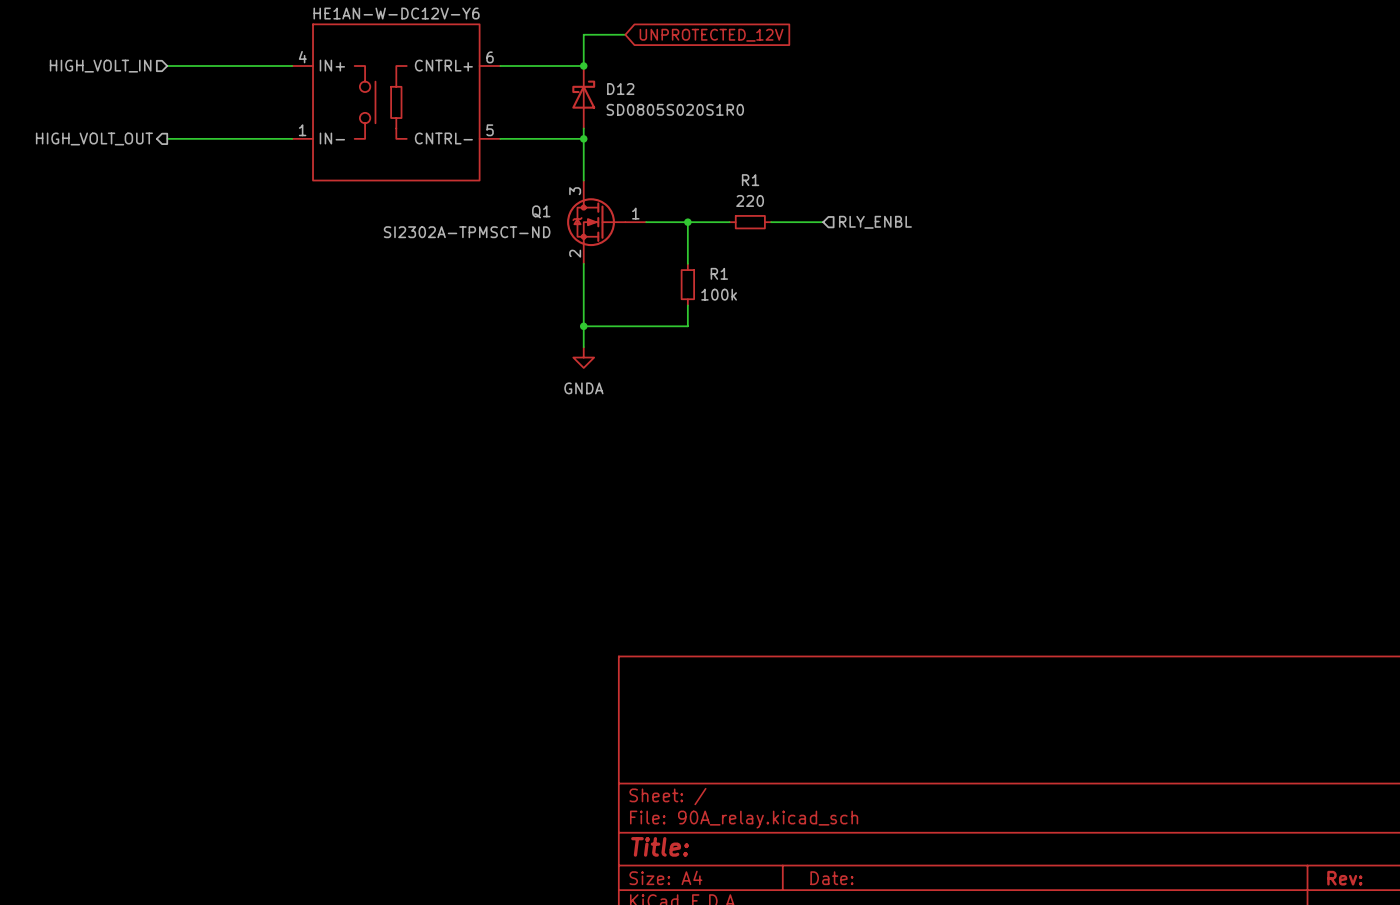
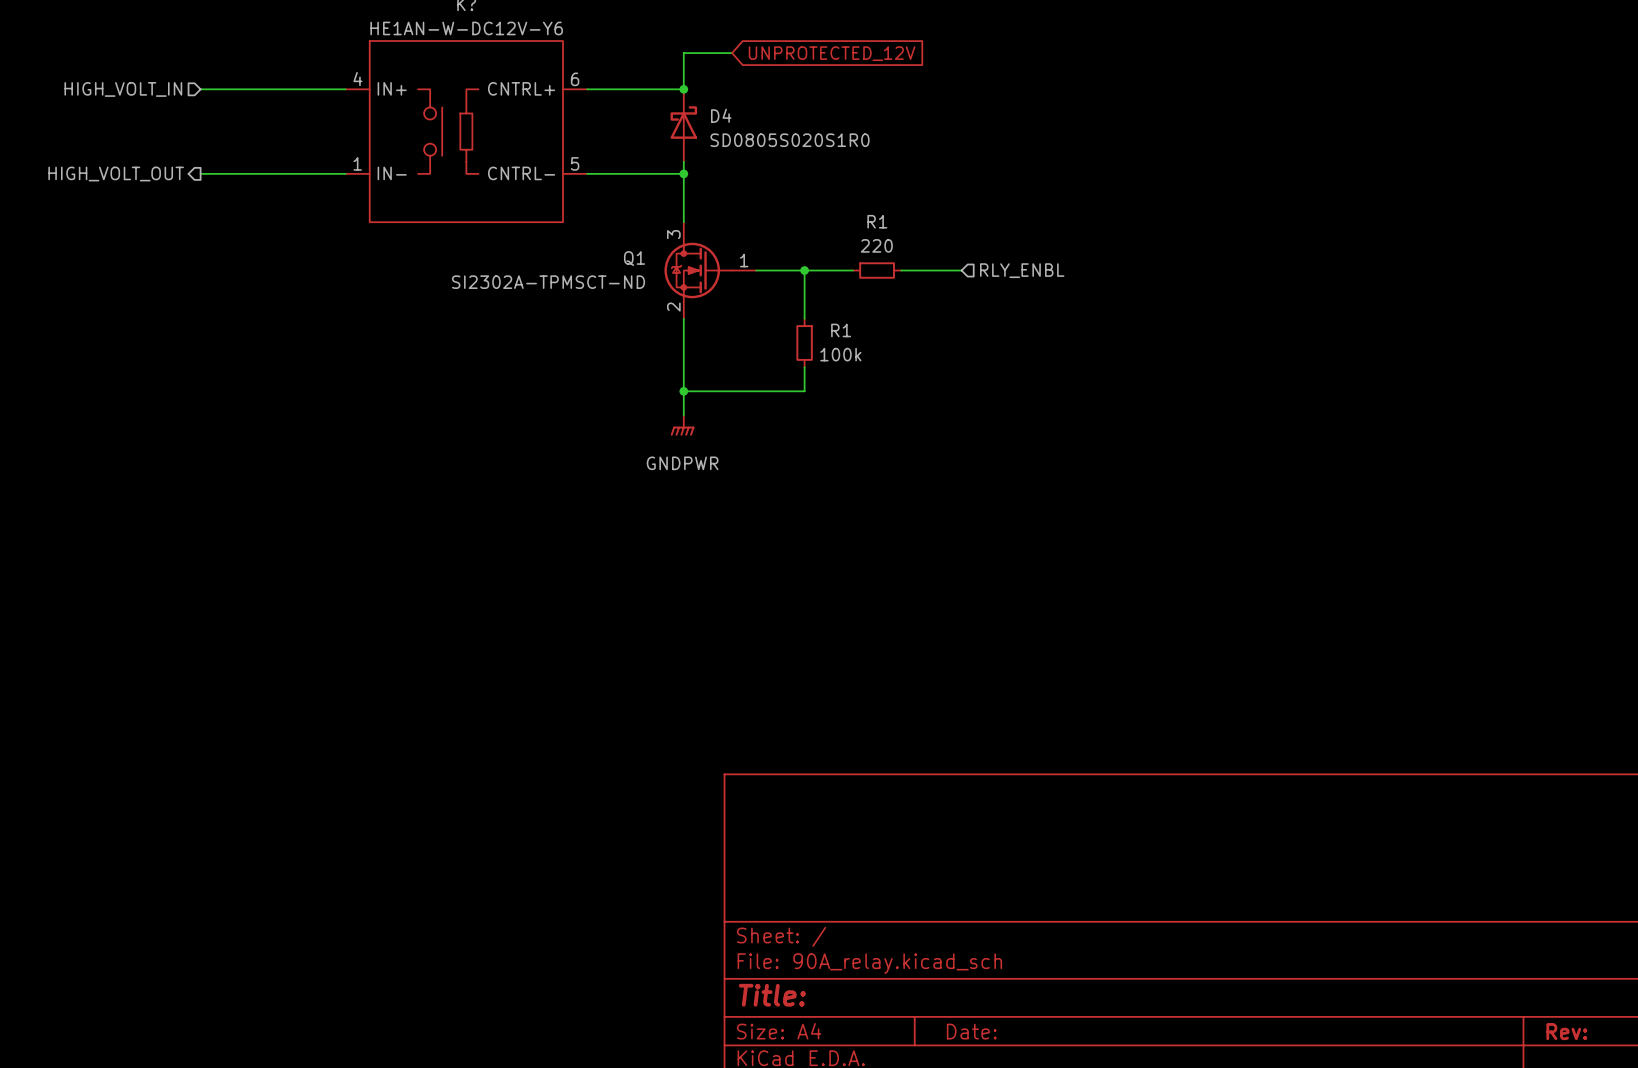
D12 name: D12 (620, 89) -> D4 (721, 115)
power symbol: GNDA (583, 357) -> GNDPWR (682, 425)

